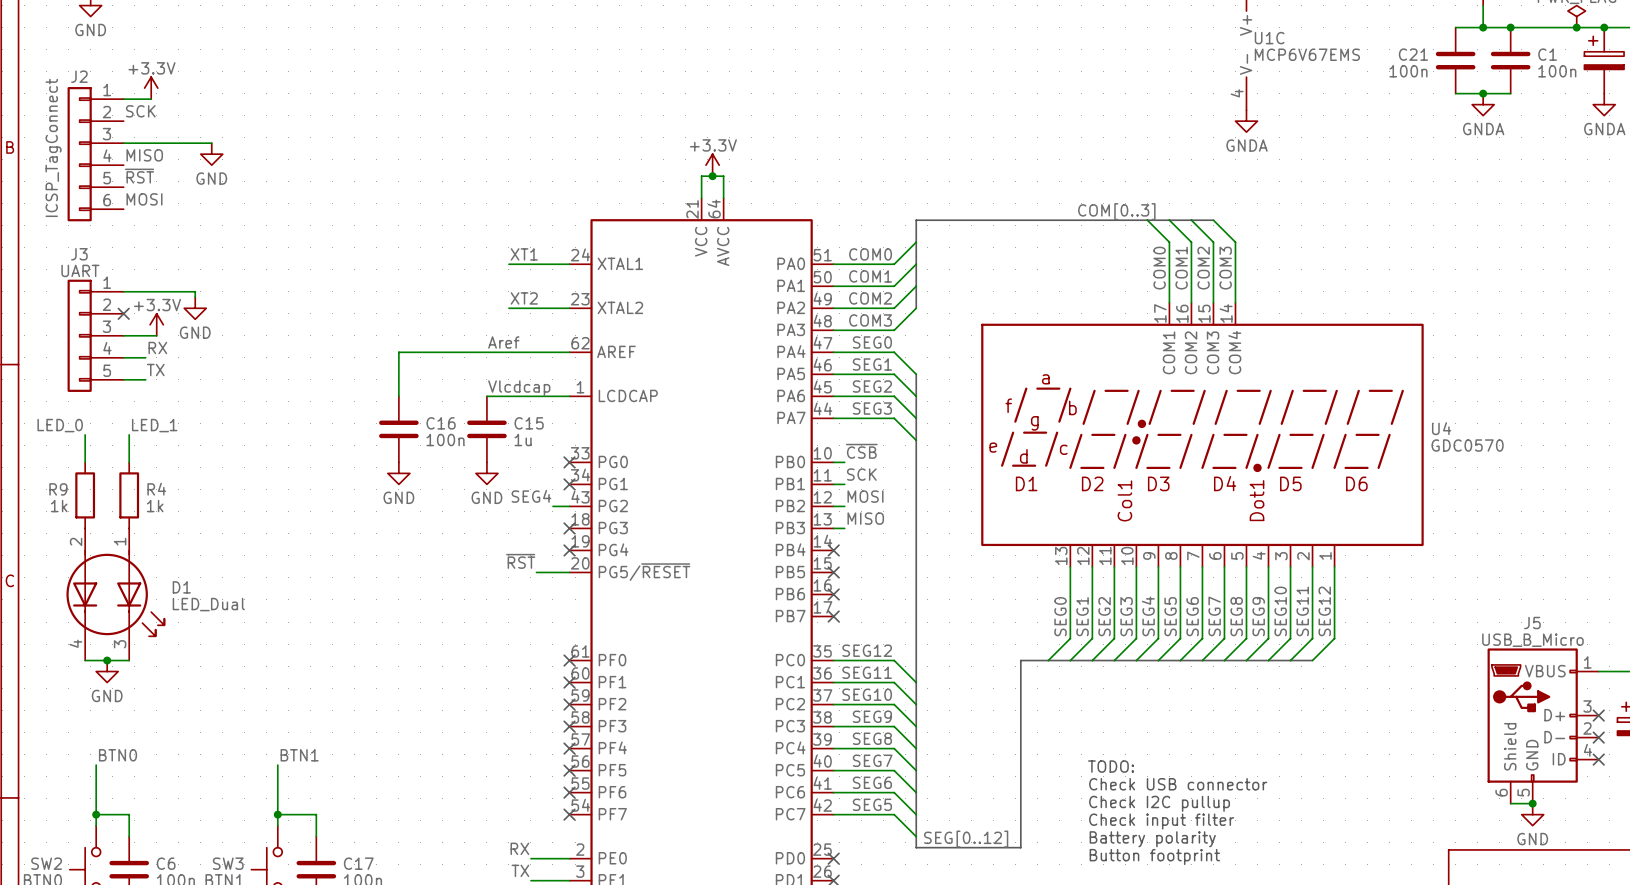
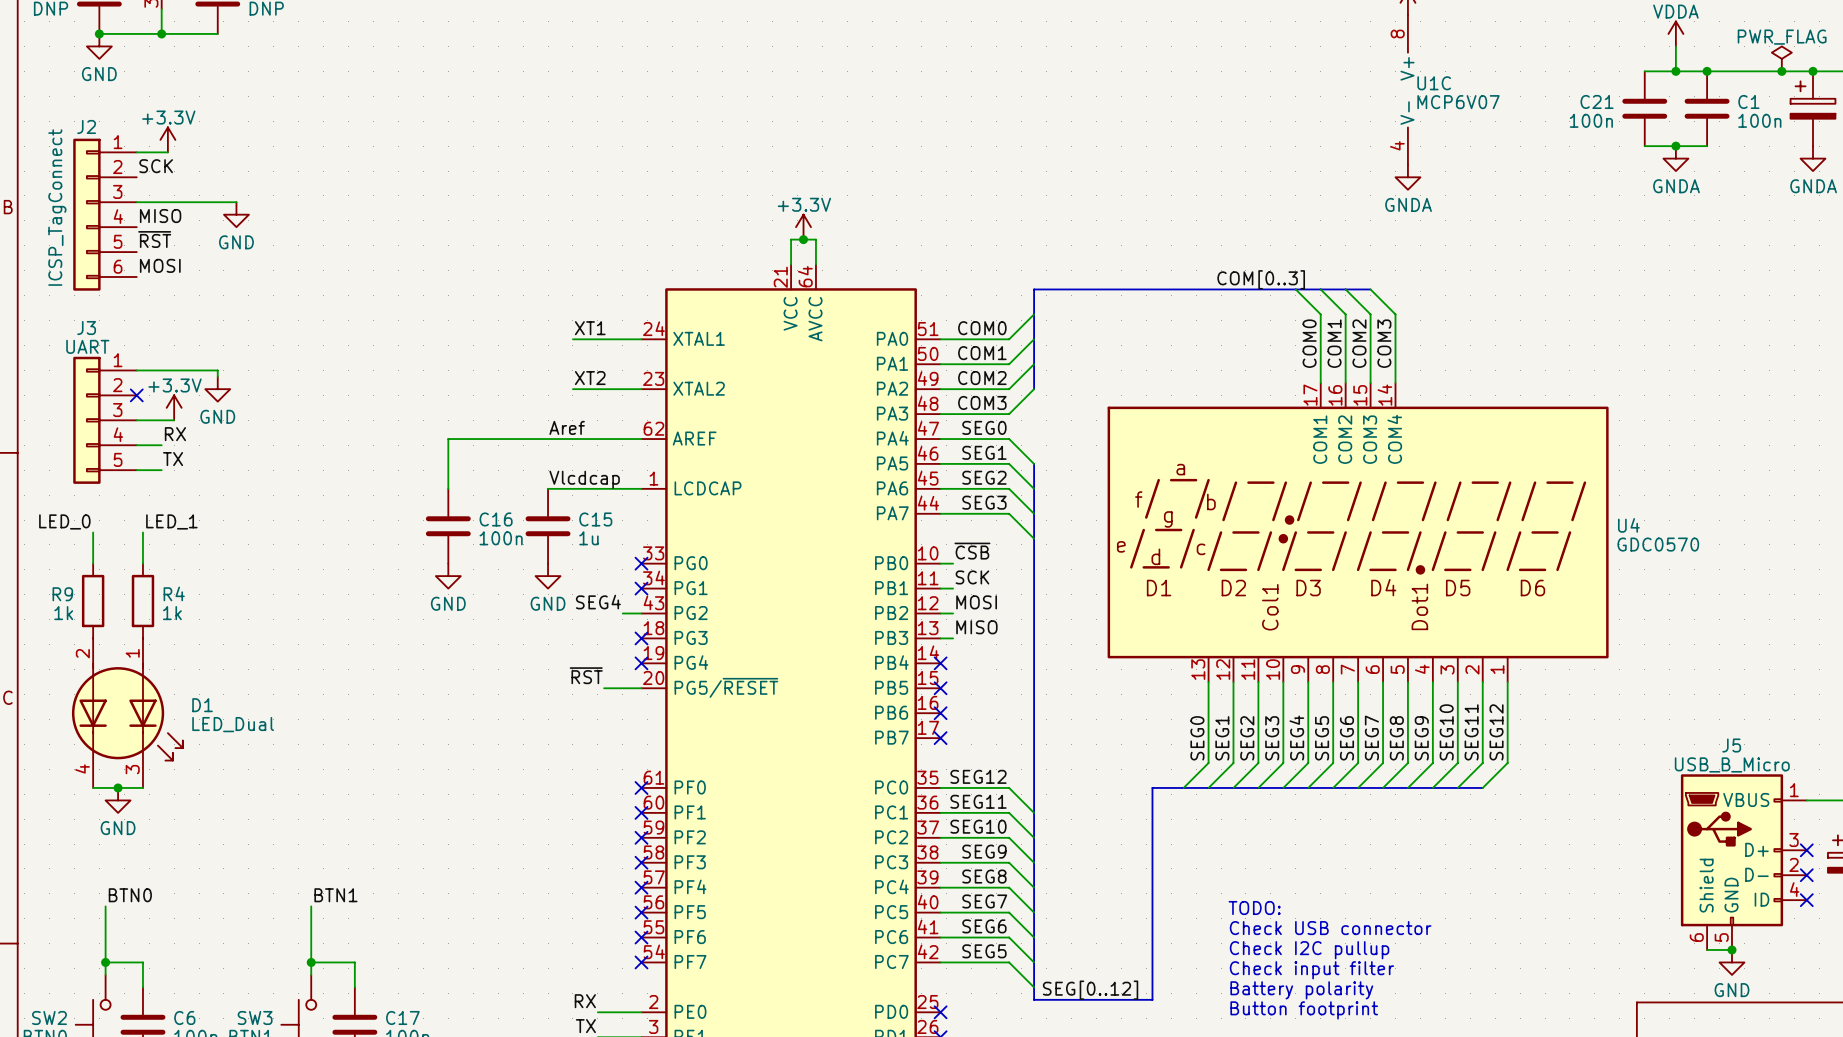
U1C value: MCP6V67EMS (1307, 54) -> MCP6V07 (1458, 102)

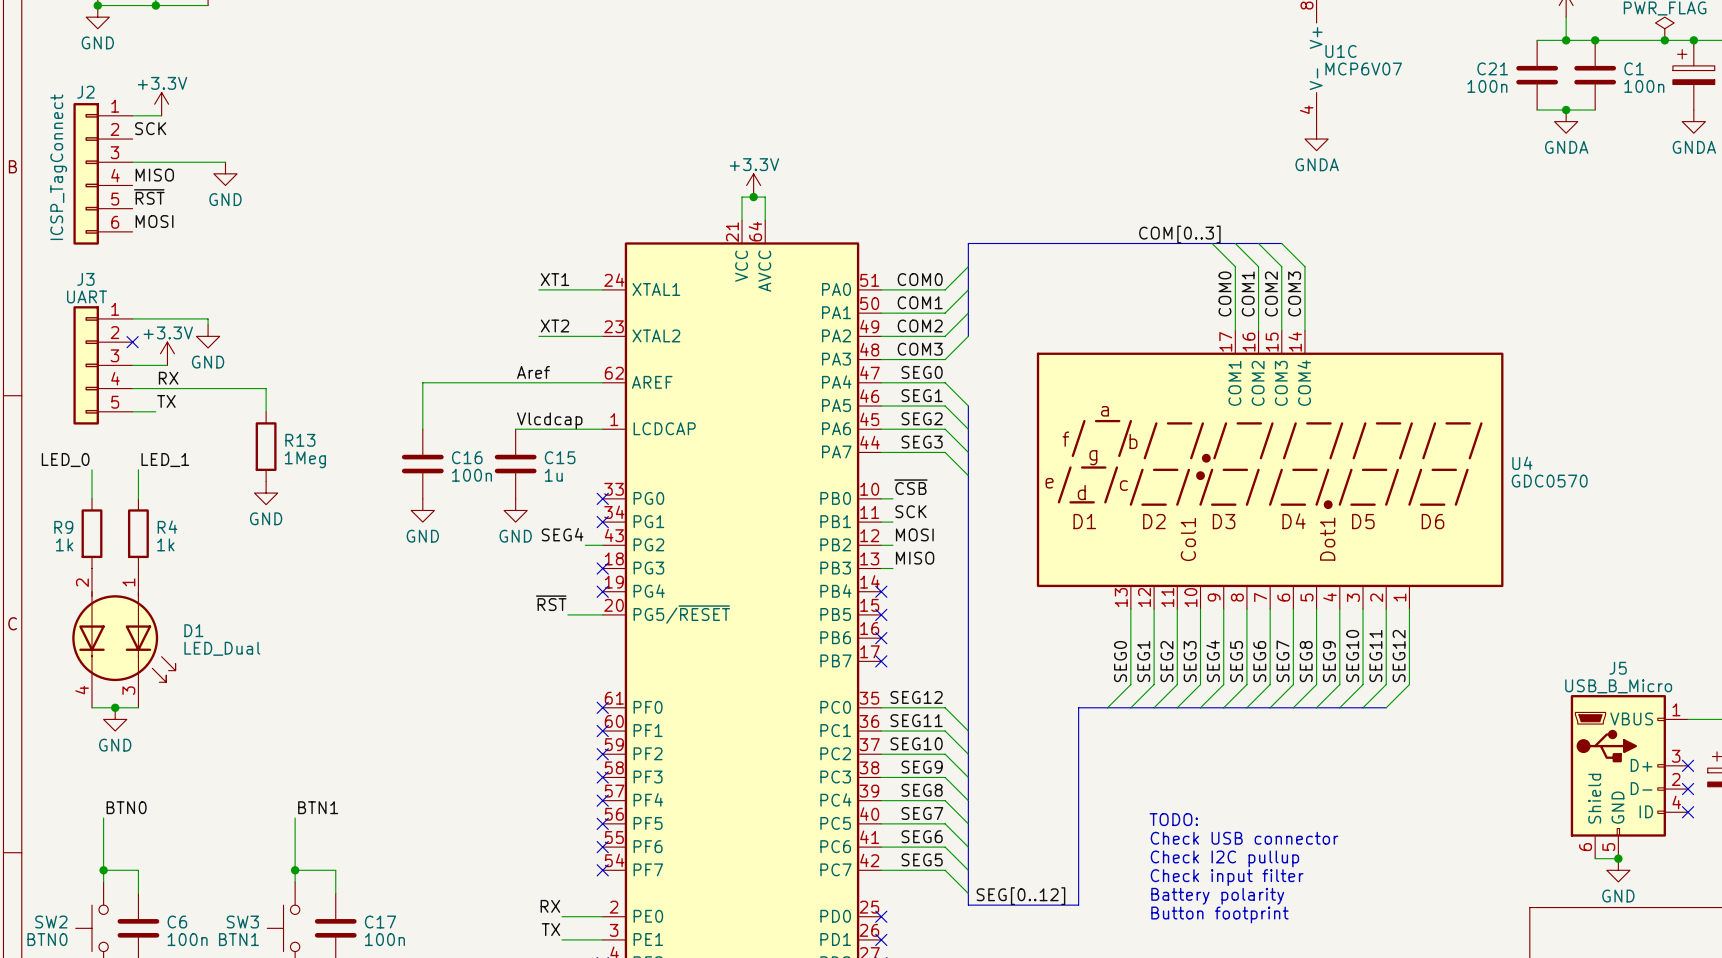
wire: none -> (155, 388) (266, 388) (266, 411)
R13: none -> 1Meg (266, 446)
power symbol: none -> GND (266, 493)

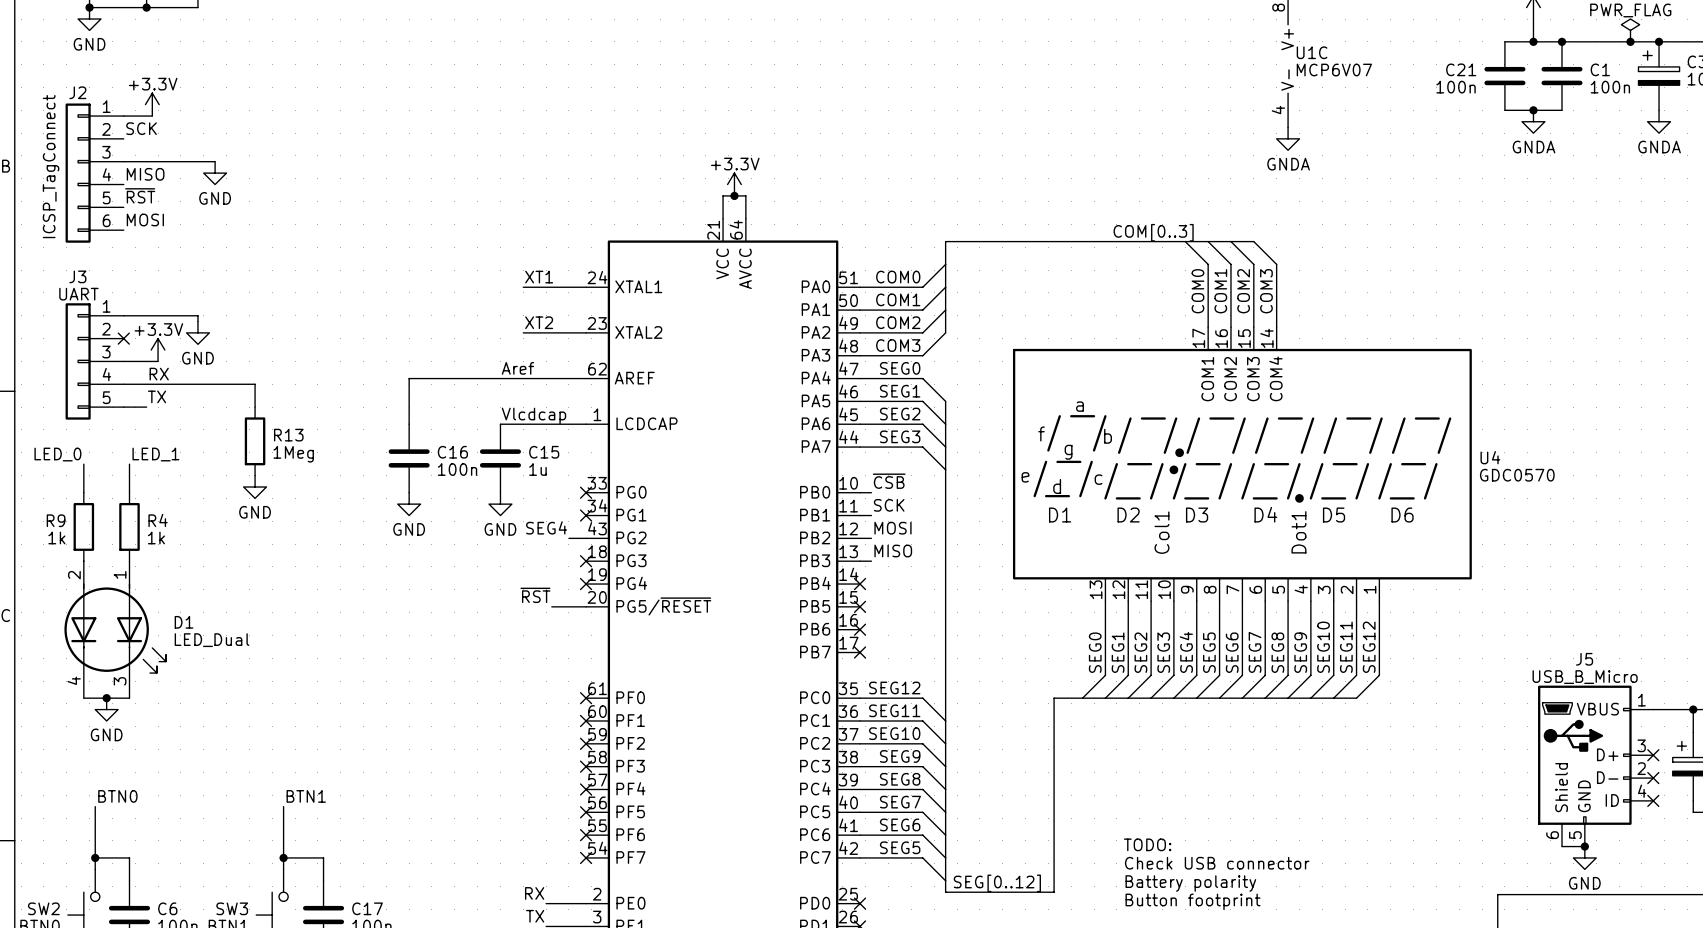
text: TODO: (1173, 819) -> none
text: Check USB connector (1244, 838) -> none
text: Check I2C pullup (1224, 858) -> TODO: (1147, 844)
text: Check input filter (1227, 877) -> Check USB connector (1217, 863)

